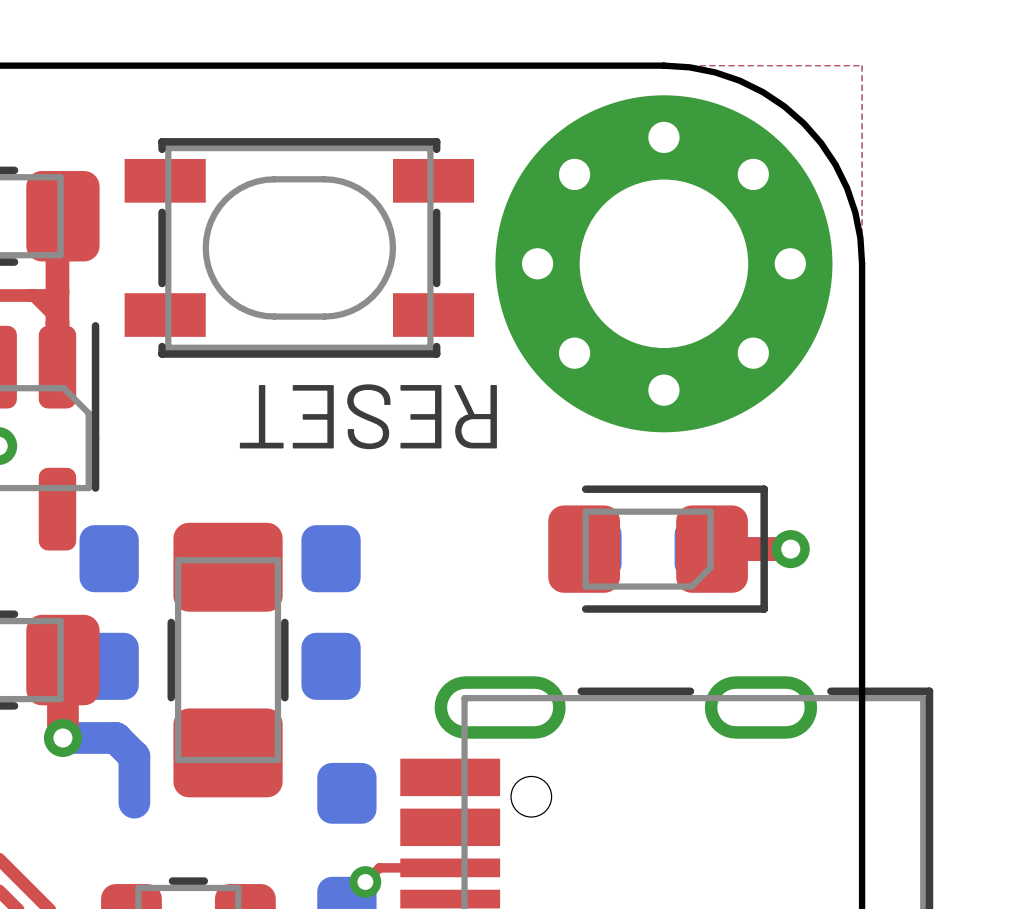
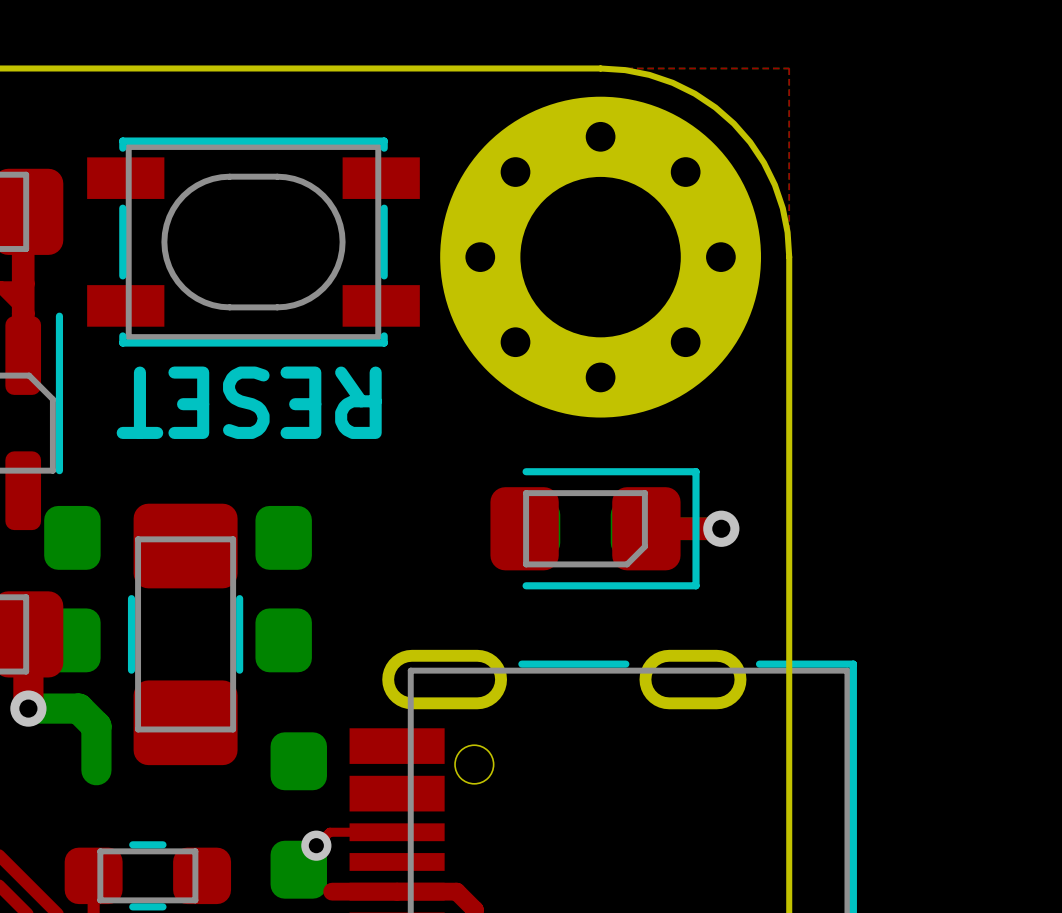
text position: RESET (368, 416) -> RESET (249, 402)

